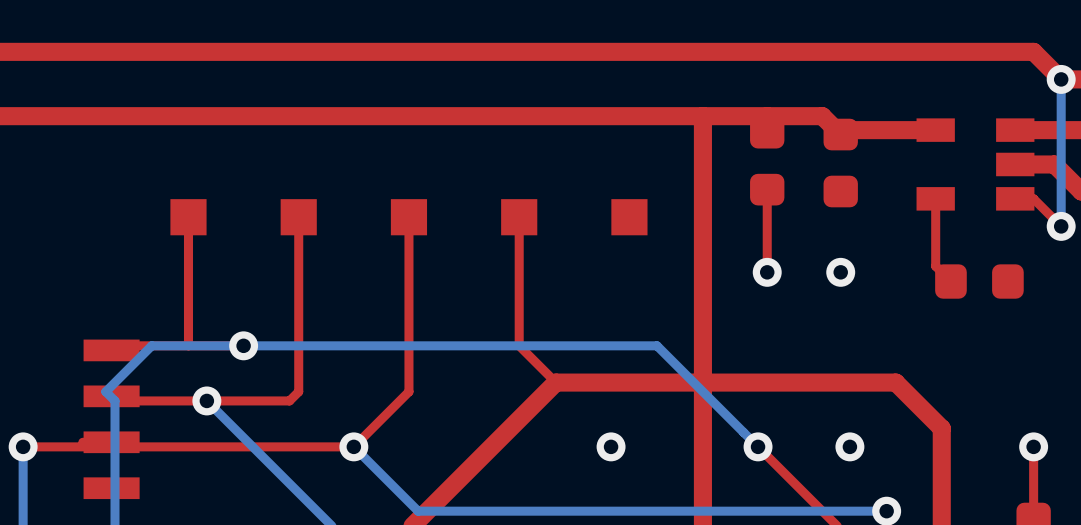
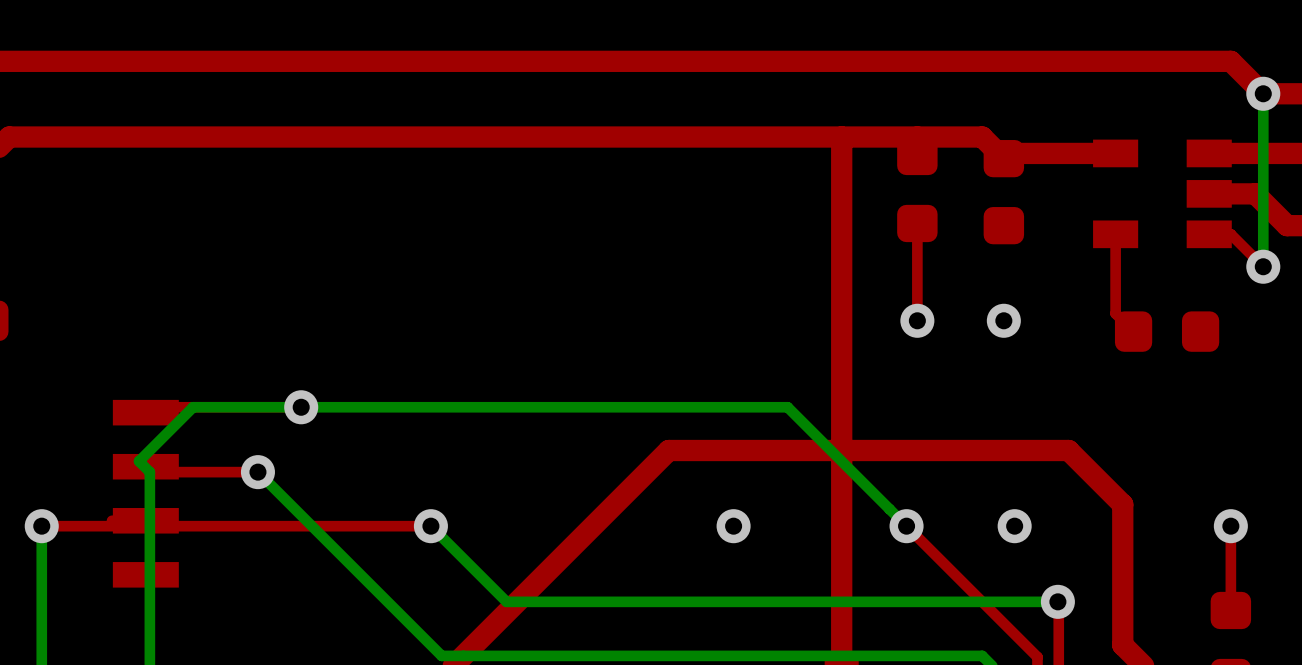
top track: (188, 217) (188, 345) -> none
part: (188, 217) -> none
top track: (298, 217) (298, 391) (289, 400) (206, 400) -> none
part: (298, 217) -> none
top track: (408, 217) (408, 391) (353, 446) -> none
part: (408, 217) -> none
top track: (519, 217) (519, 345) (555, 382) -> none
part: (519, 217) -> none
part: (629, 217) -> none

